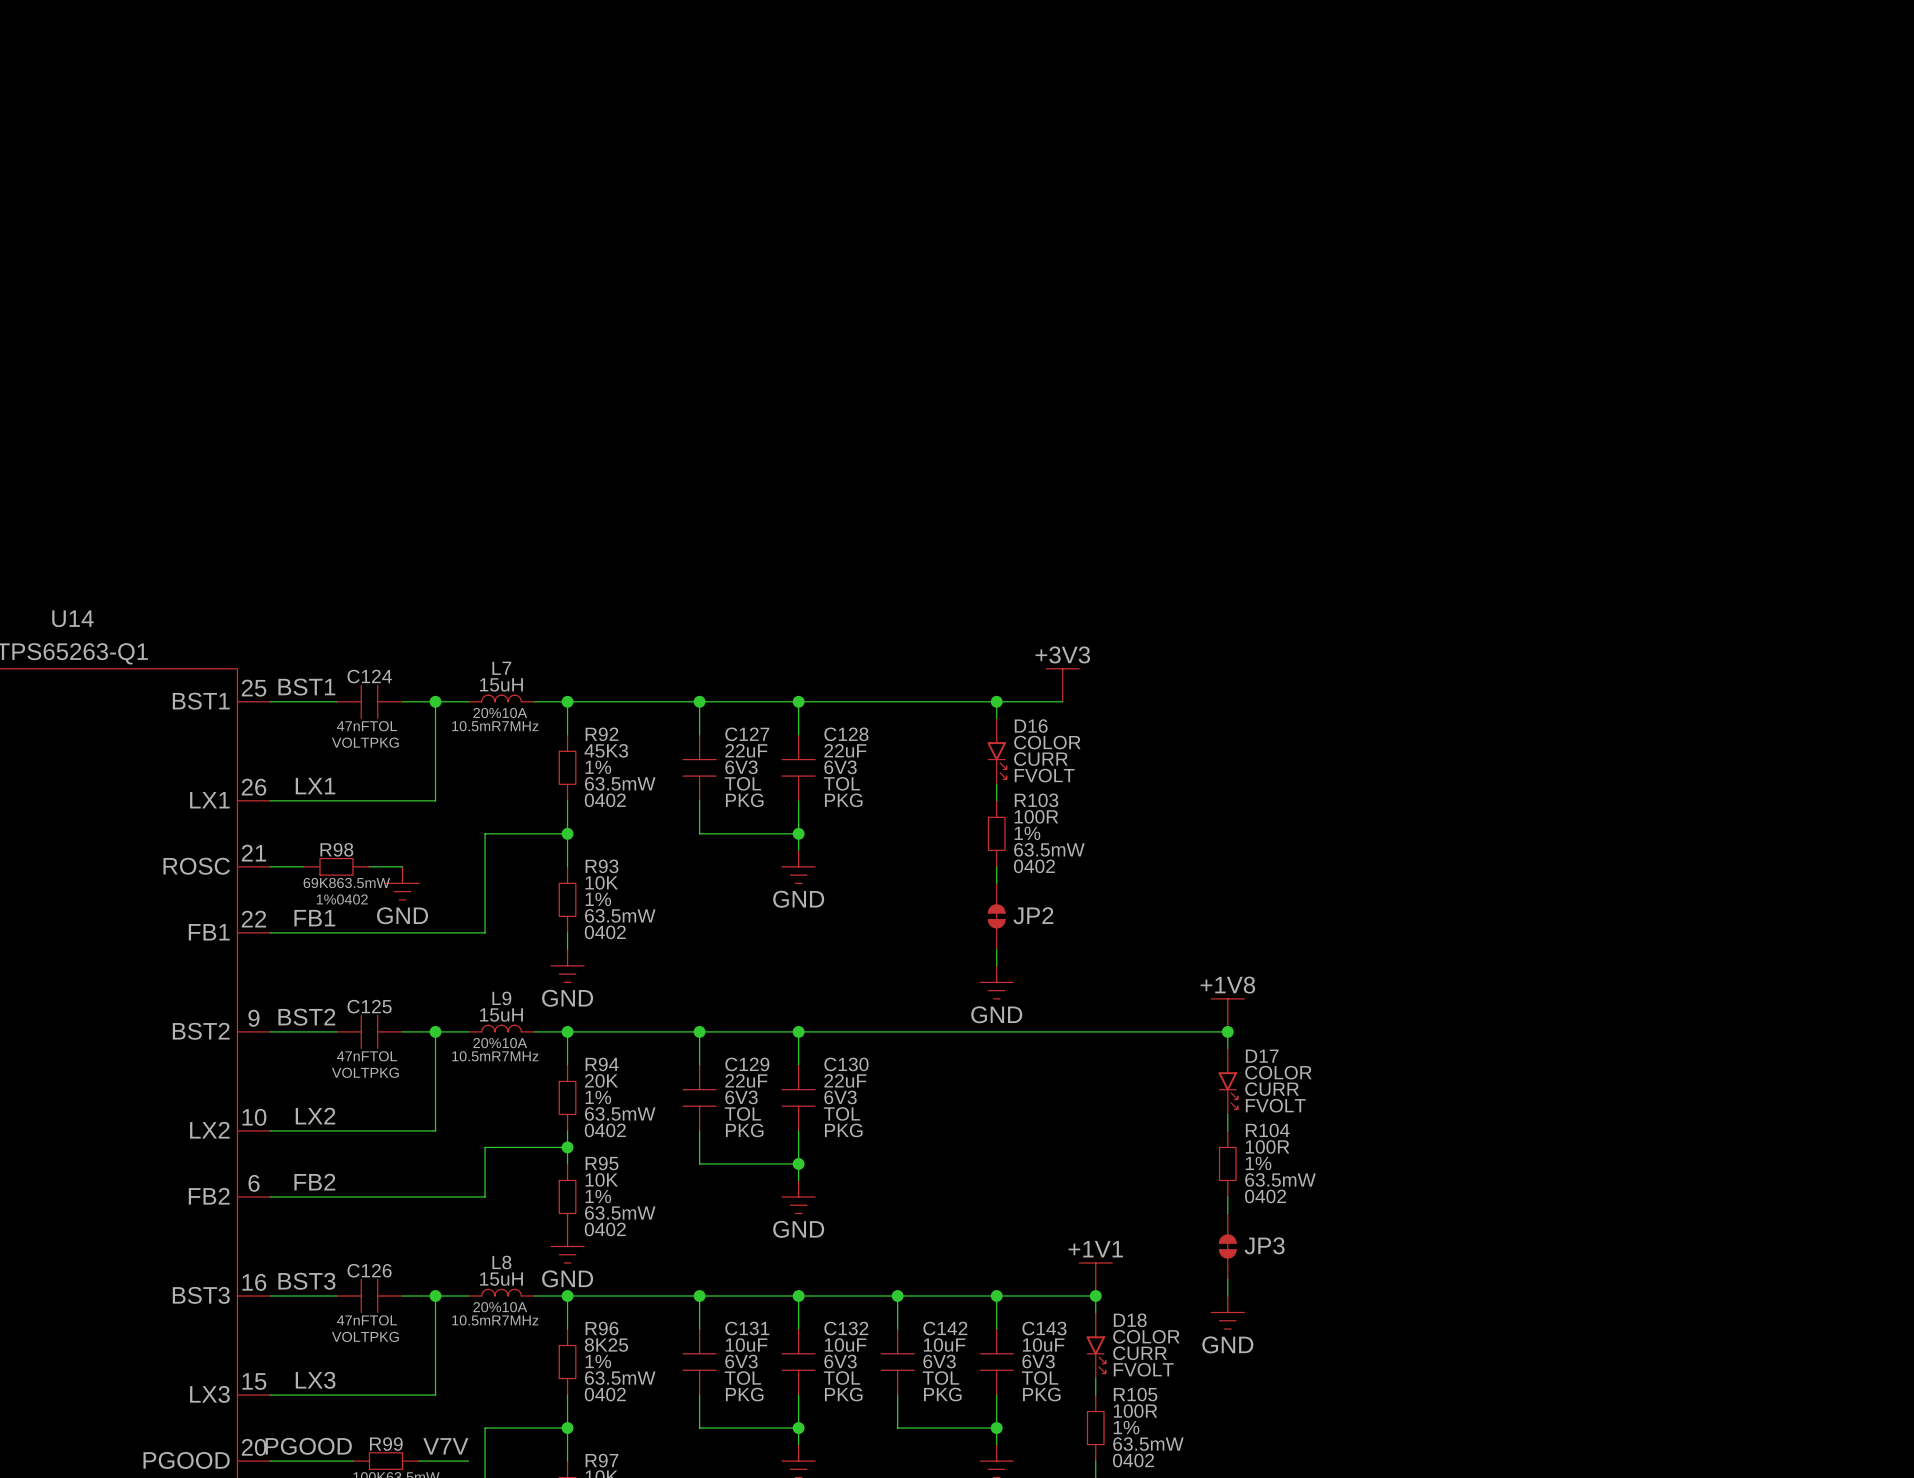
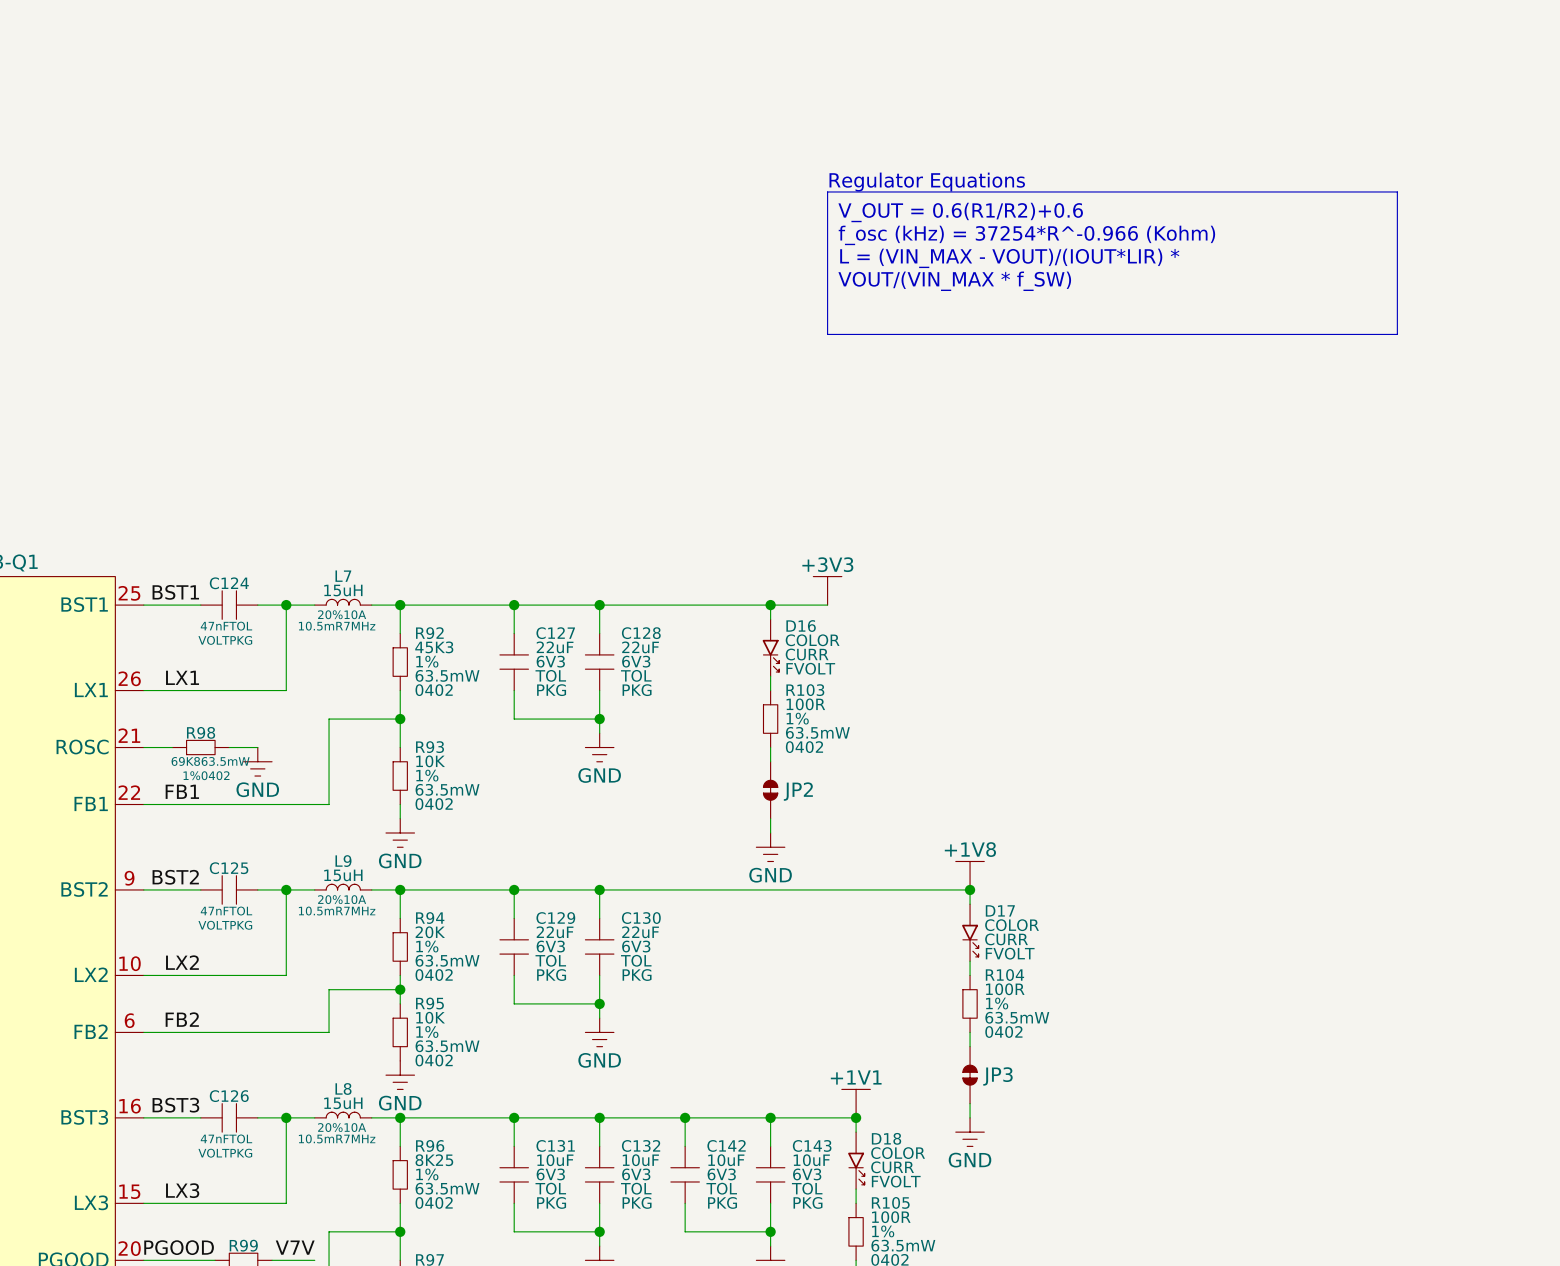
text: none -> Regulator Equations (927, 182)
line: none -> (827, 191) (1397, 191) (1397, 334) (827, 334) (827, 191)
text: none -> V_OUT = 0.6(R1/R2)+0.6 (960, 212)
text: none -> f_osc (kHz) = 37254*R^-0.966 (Kohm) (1026, 235)
text: none -> L = (VIN_MAX - VOUT)/(IOUT*LIR) * (1009, 258)
text: none -> VOUT/(VIN_MAX * f_SW) (954, 281)

